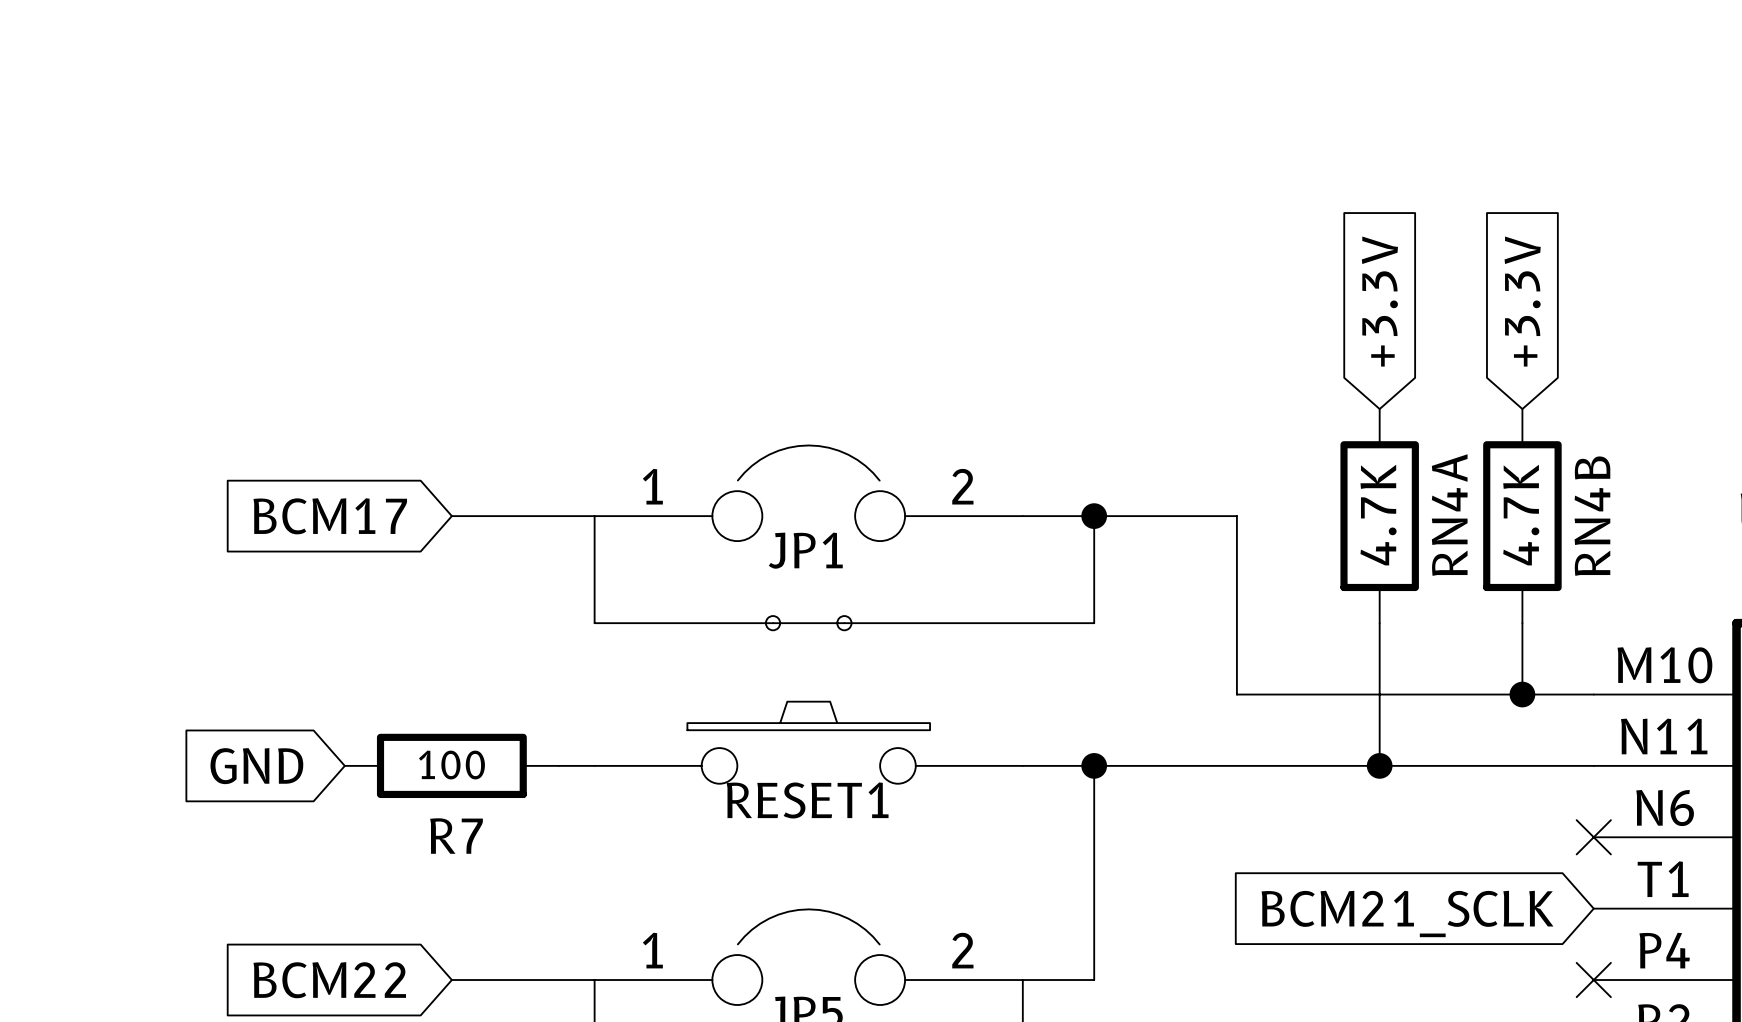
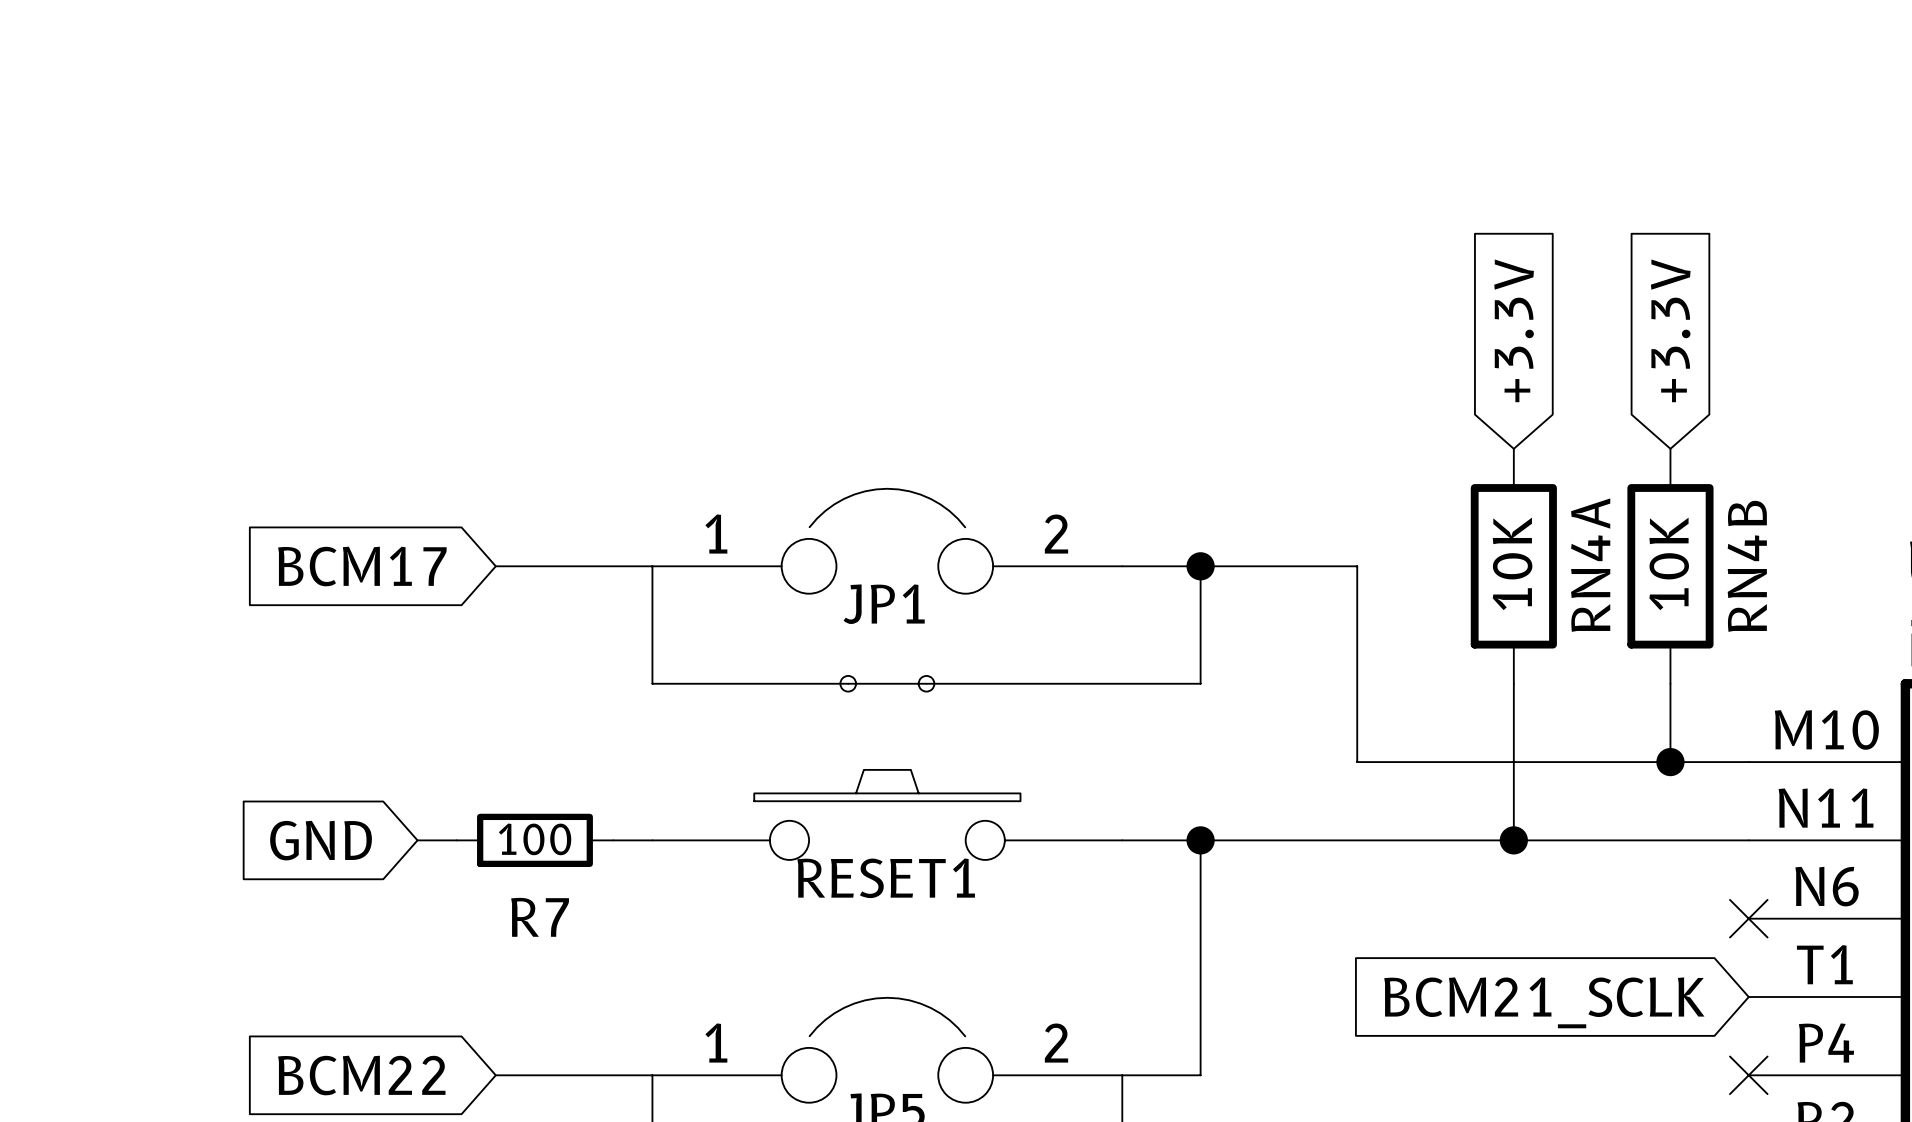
RN4A value: 4.7K (1378, 515) -> 10K (1512, 563)
RN4B value: 4.7K (1521, 515) -> 10K (1669, 563)
R7 symbol: [344, 733, 559, 799] -> [456, 813, 614, 868]
wire: none -> (417, 840) (456, 840)
global label position: GND (256, 766) -> GND (321, 840)

